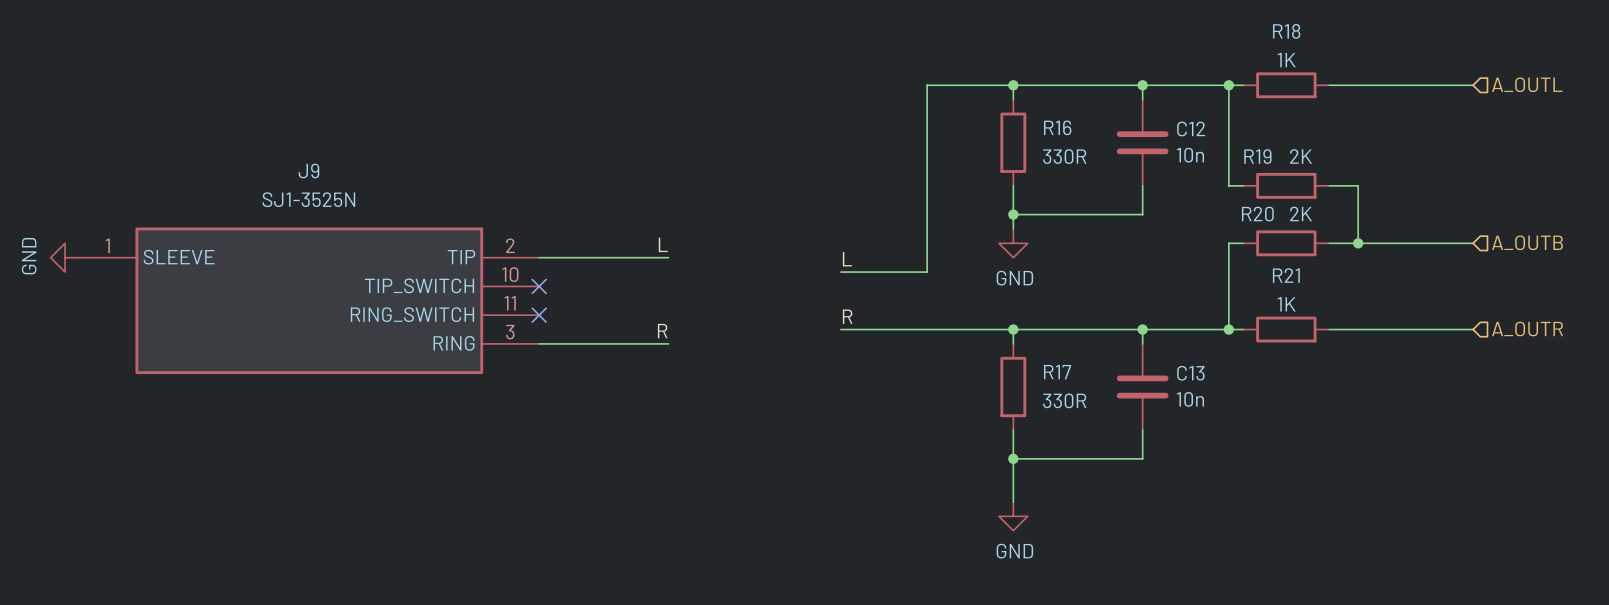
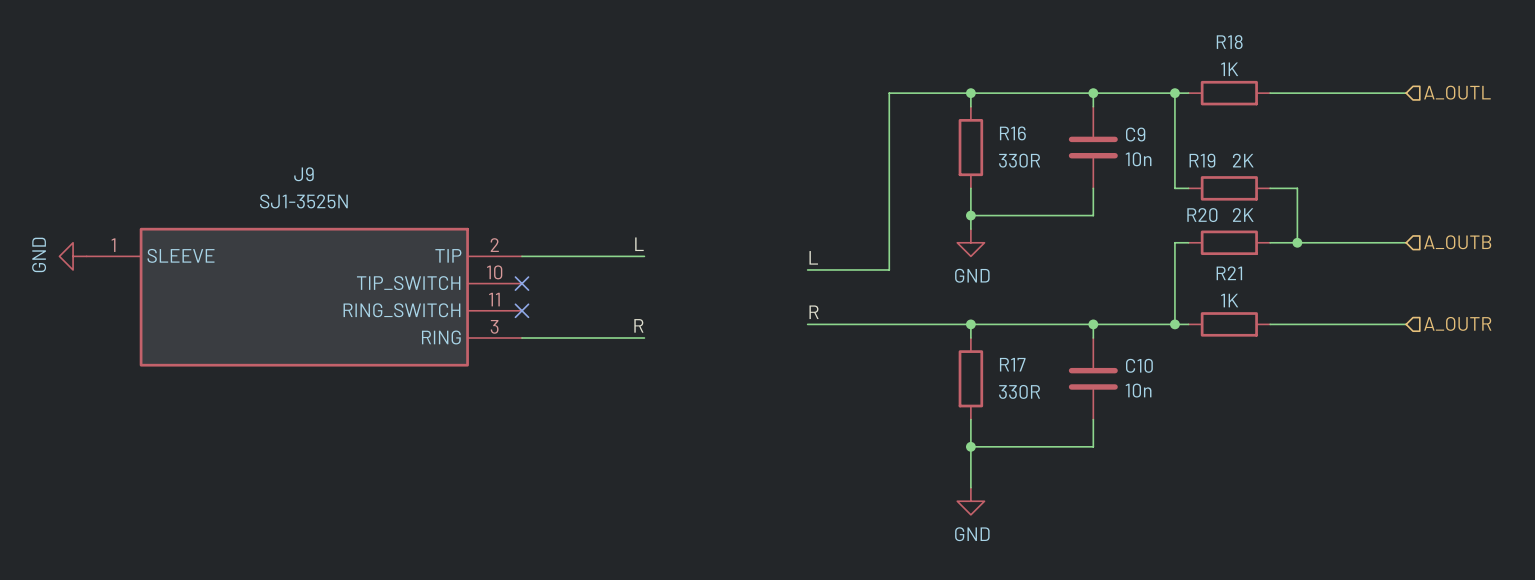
C12 name: C12 (1191, 129) -> C9 (1135, 134)
C13 name: C13 (1190, 373) -> C10 (1139, 365)

